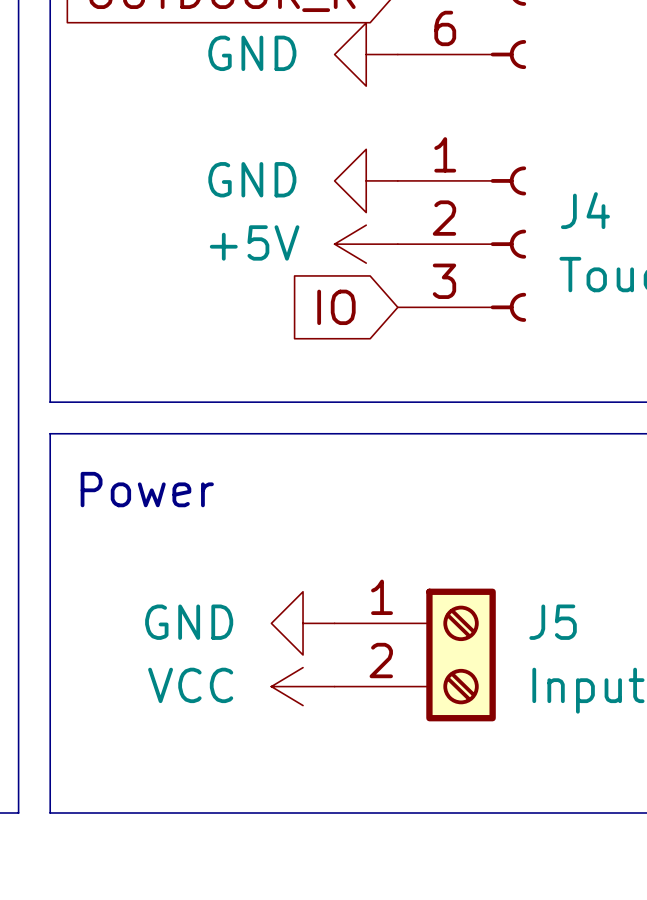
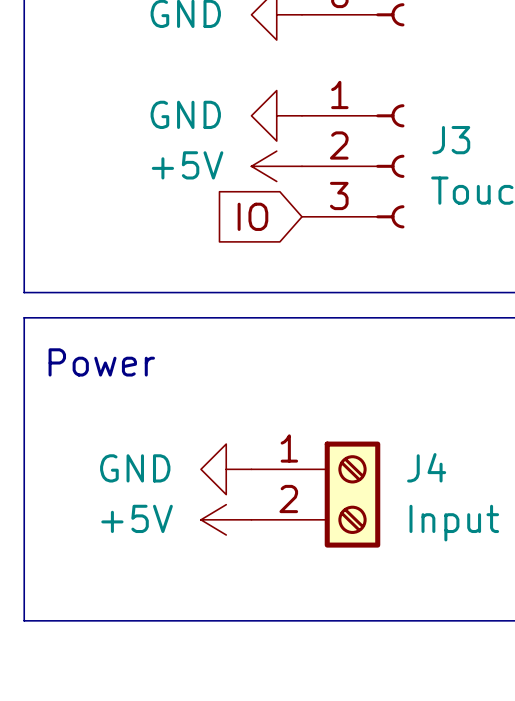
J4 name: J4 (585, 210) -> J3 (451, 140)
J5 name: J5 (553, 622) -> J4 (426, 467)
power symbol: VCC (303, 686) -> +5V (226, 519)

